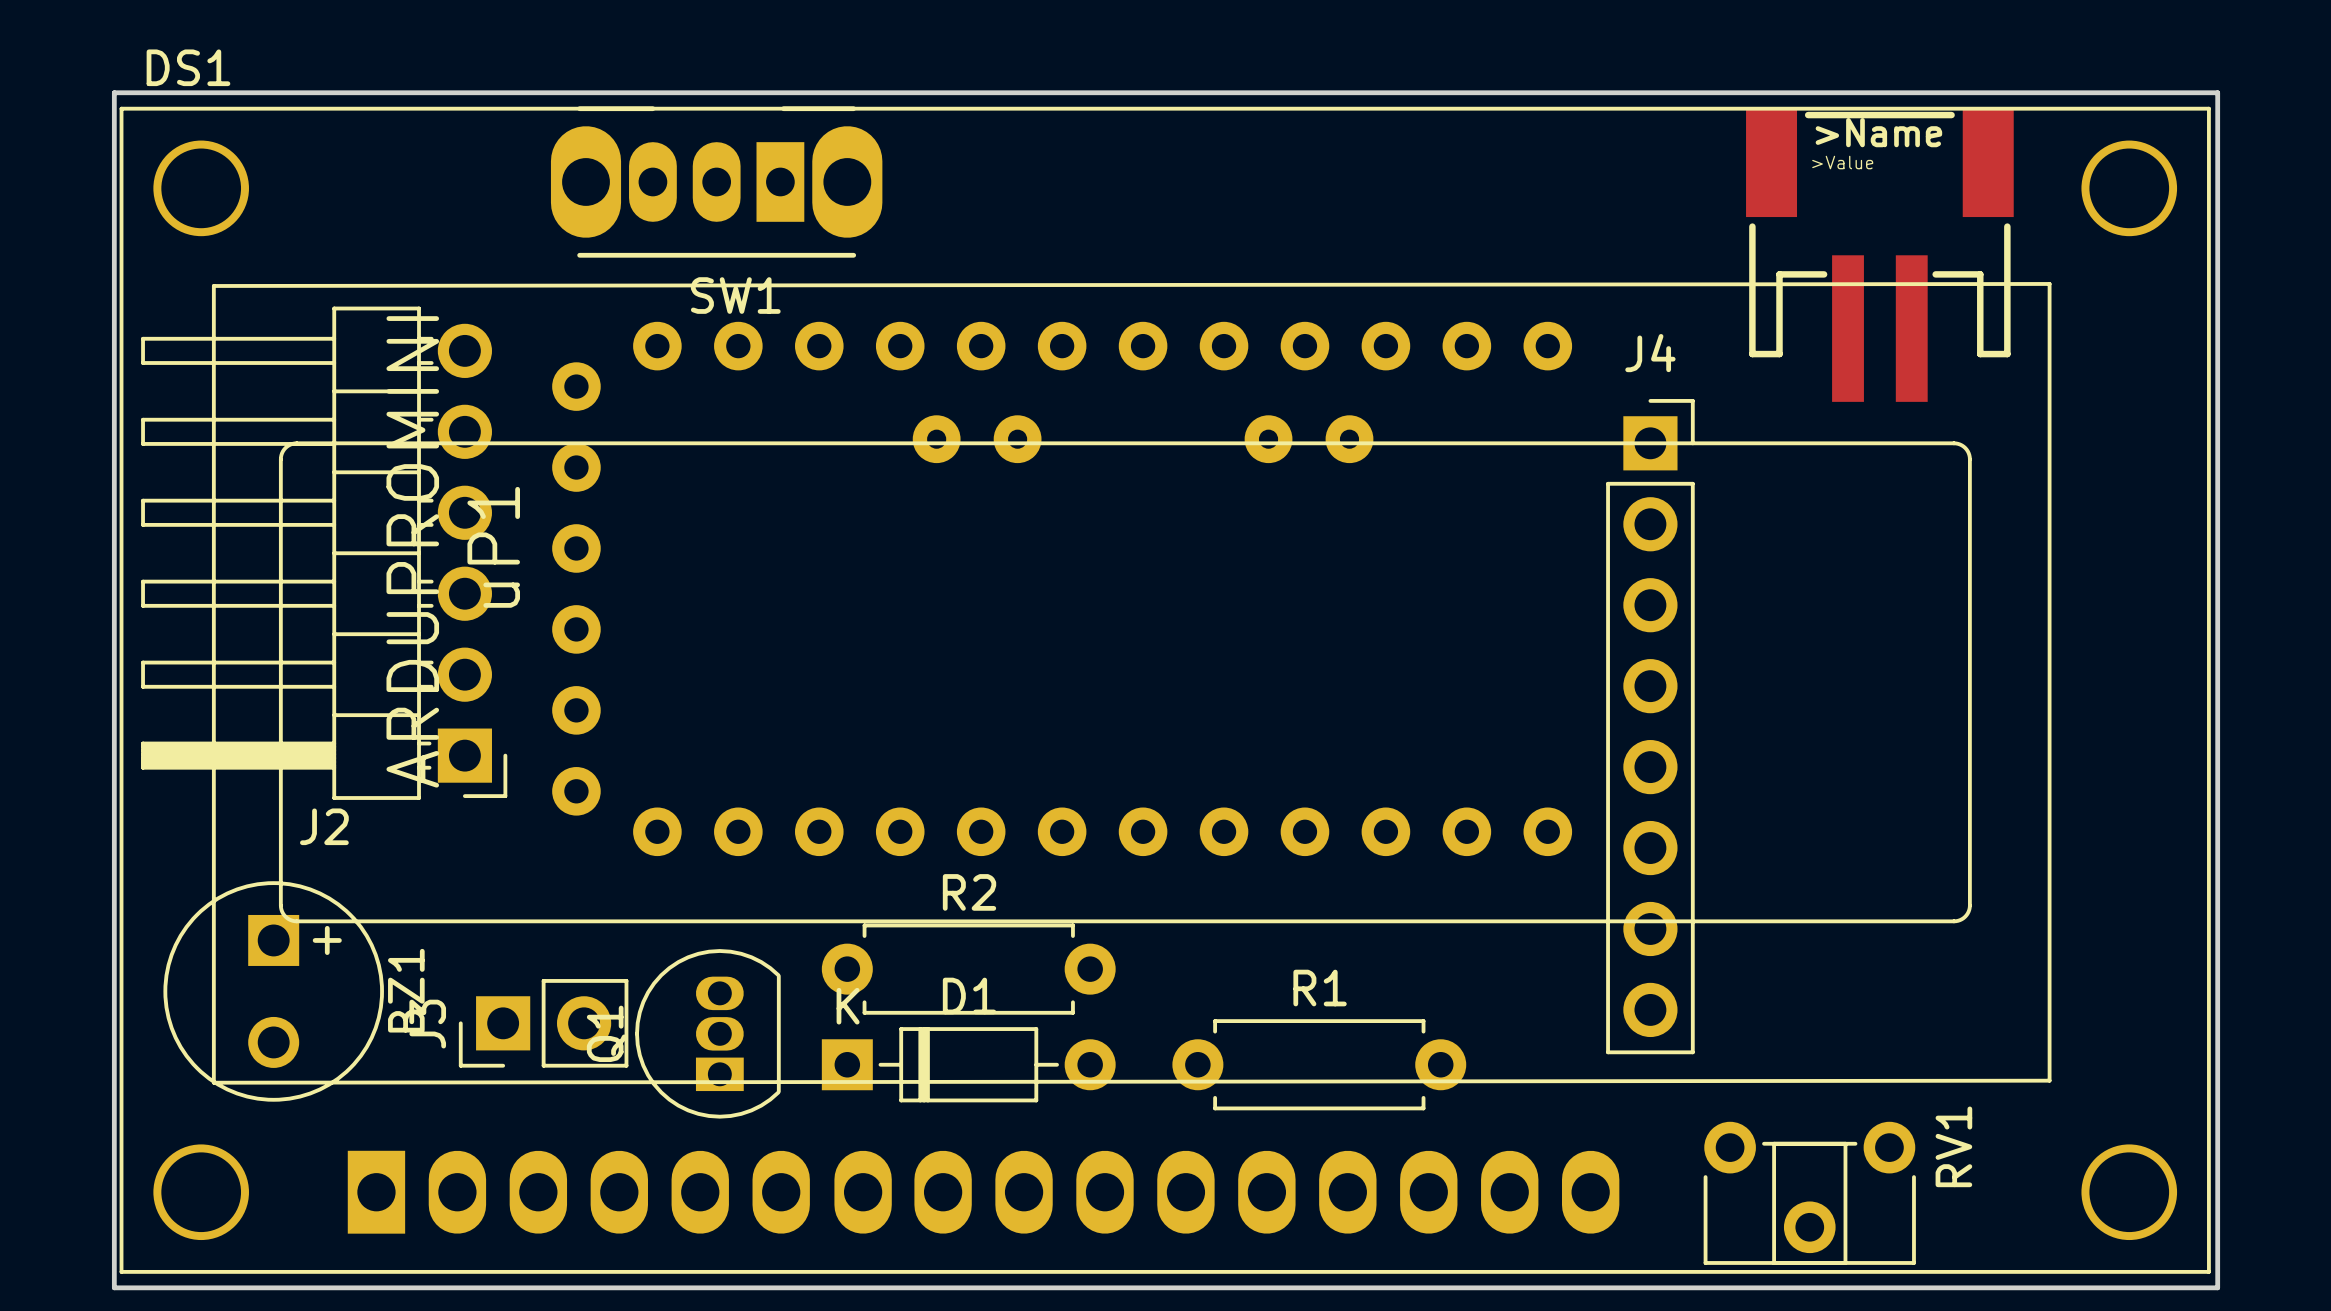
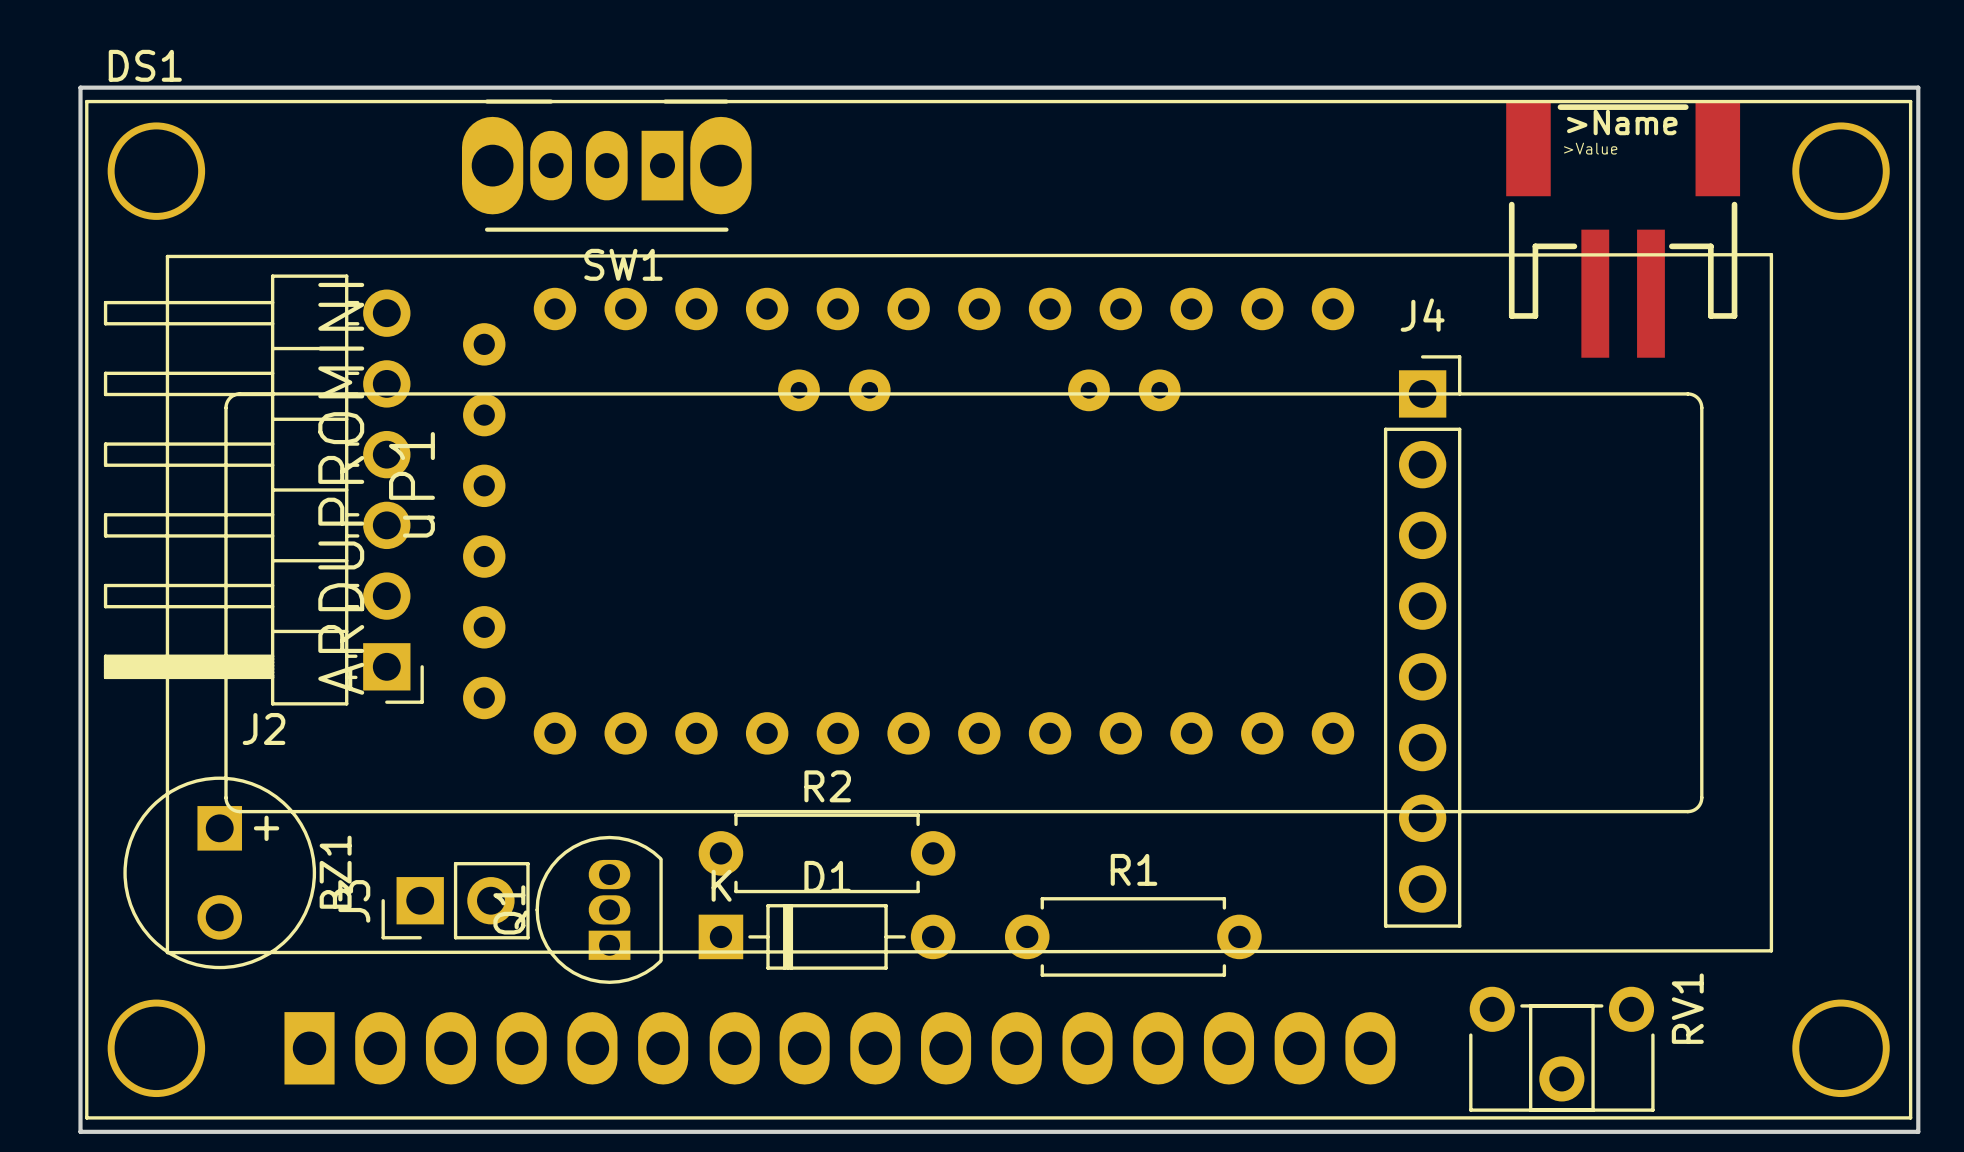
DS1 footprint: [119, 106, 2211, 1274] -> [85, 99, 1913, 1120]

